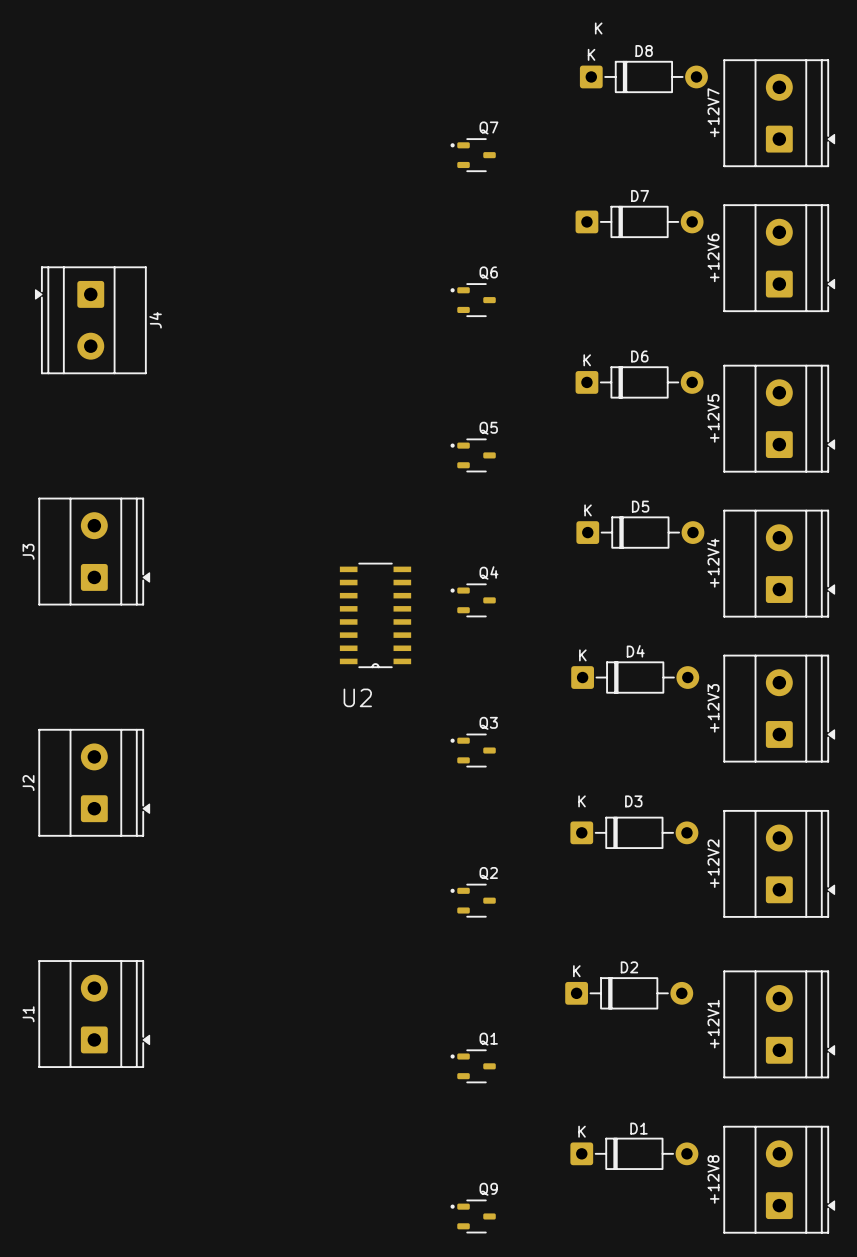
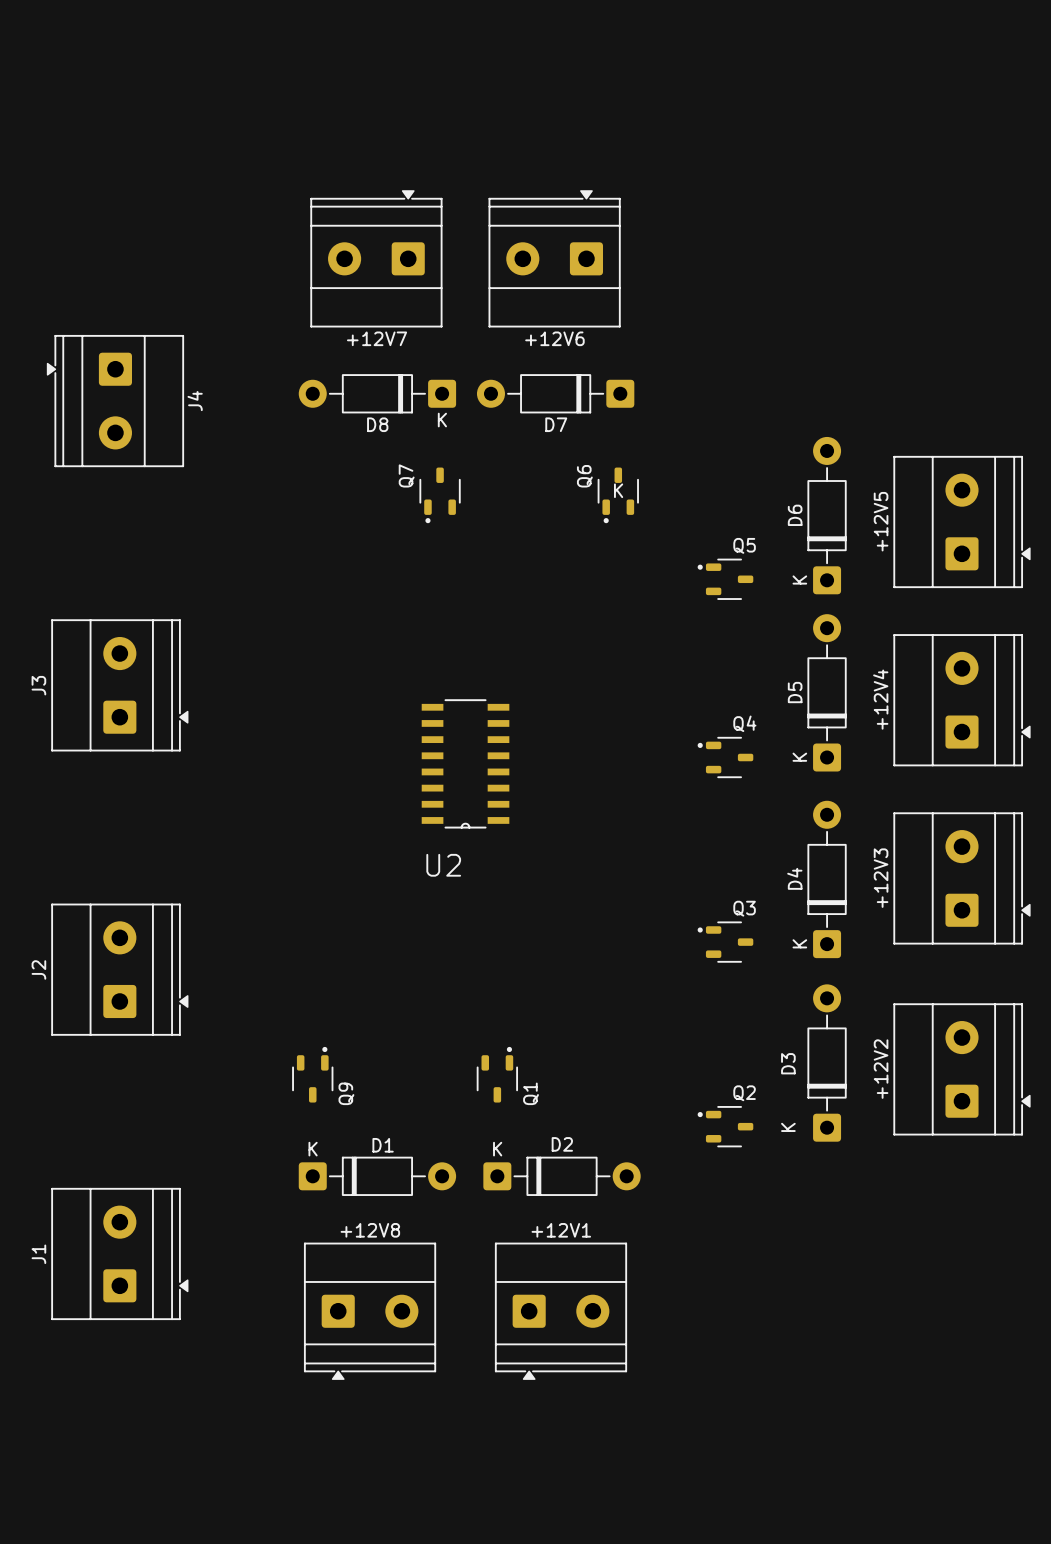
D8 rotation: 0° (643, 76) -> 180° (377, 393)
D8 position: (643, 76) -> (377, 393)
+12V7 rotation: 0° (779, 113) -> 90° counterclockwise (376, 258)
+12V7 position: (779, 113) -> (376, 258)
Q7 rotation: 0° (473, 155) -> 90° counterclockwise (440, 495)
Q7 position: (473, 155) -> (440, 495)
D7 name position: D7 (640, 195) -> D7 (556, 424)
D7 footprint: [575, 206, 704, 238] -> [476, 374, 635, 414]
+12V6 rotation: 0° (779, 258) -> 90° counterclockwise (554, 258)
+12V6 position: (779, 258) -> (554, 258)
Q6 rotation: 0° (473, 300) -> 90° counterclockwise (618, 495)
Q6 position: (473, 300) -> (618, 495)
D6 rotation: 0° (639, 382) -> 90° counterclockwise (827, 515)
Q5 position: (473, 455) -> (725, 579)
D5 rotation: 0° (640, 532) -> 90° counterclockwise (827, 692)
Q4 position: (473, 600) -> (725, 757)
D4 rotation: 0° (635, 677) -> 90° counterclockwise (827, 879)
Q3 position: (473, 750) -> (725, 942)
D3 rotation: 0° (634, 832) -> 90° counterclockwise (827, 1063)
Q2 position: (473, 900) -> (725, 1126)
D2 position: (629, 993) -> (562, 1176)
+12V1 rotation: 0° (779, 1024) -> 90° clockwise (561, 1311)
+12V1 position: (779, 1024) -> (561, 1311)
Q1 rotation: 0° (473, 1066) -> 90° clockwise (497, 1074)
Q1 position: (473, 1066) -> (497, 1074)
D1 position: (634, 1153) -> (377, 1176)
+12V8 rotation: 0° (779, 1179) -> 90° clockwise (370, 1311)
+12V8 position: (779, 1179) -> (370, 1311)
Q9 rotation: 0° (473, 1216) -> 90° clockwise (312, 1074)
Q9 position: (473, 1216) -> (312, 1074)

